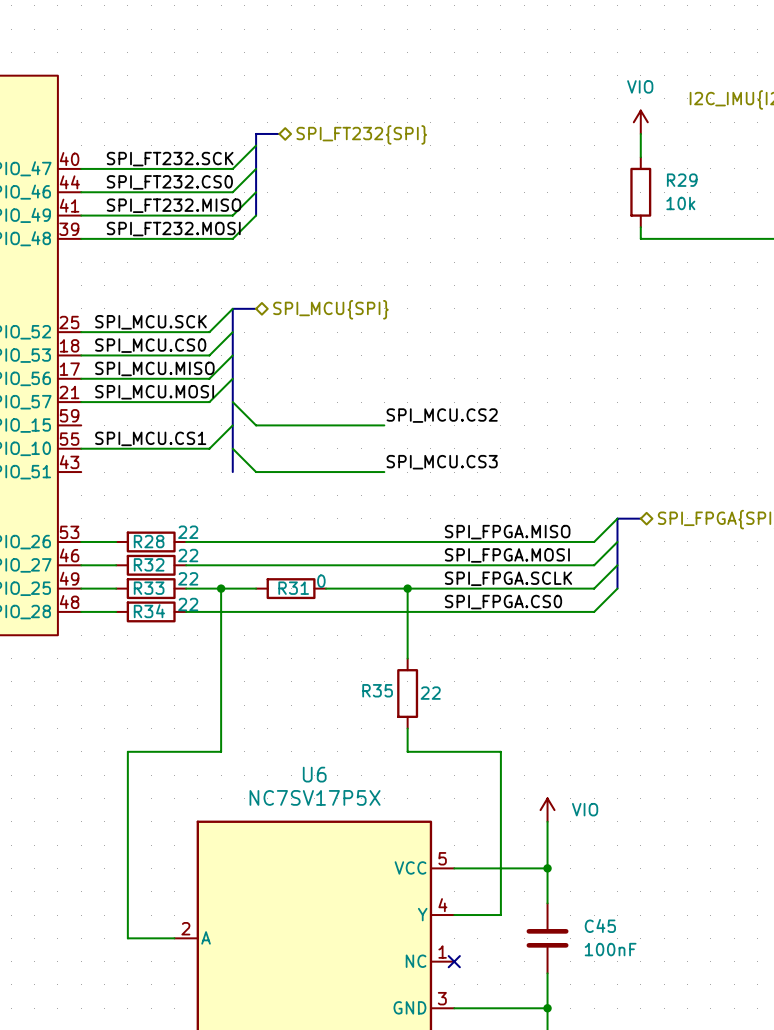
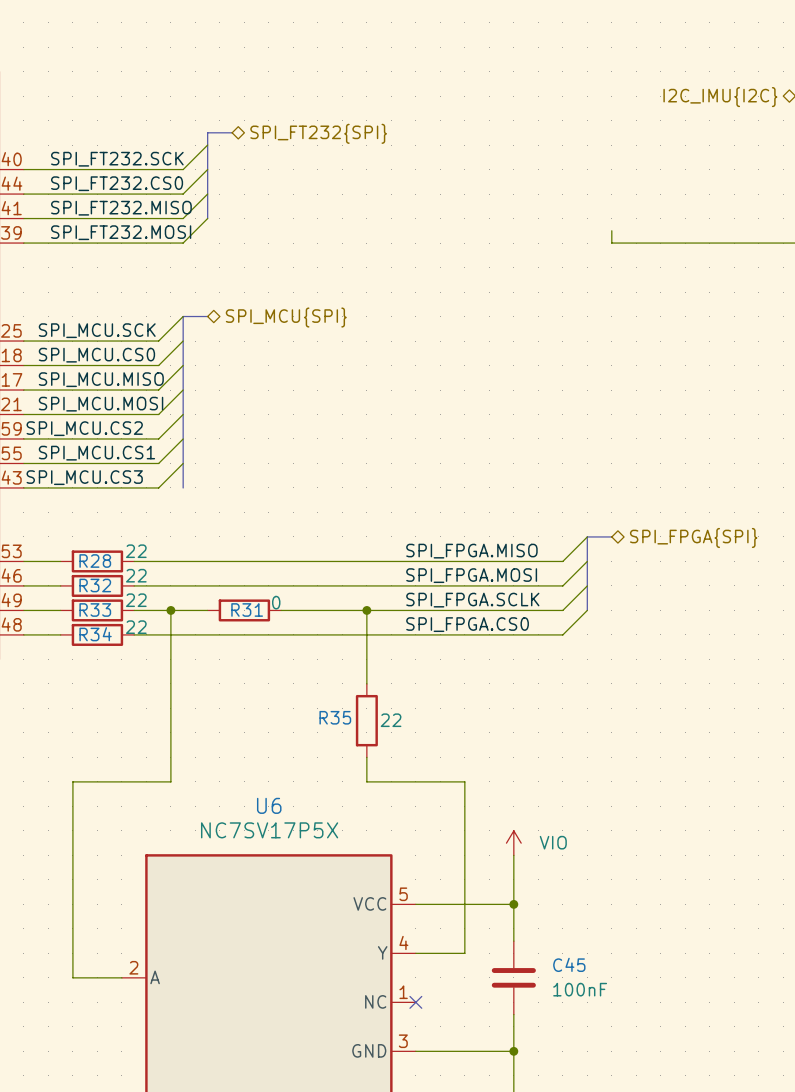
power symbol: VIO (640, 122) -> none
wire: (640, 133) (640, 157) -> none
R29: 10k (640, 192) -> none
wire: (232, 402) (256, 425) (384, 425) -> (183, 414) (158, 438) (23, 438)
label: none -> SPI_MCU.CS2 (84, 428)
label: SPI_MCU.CS2 (442, 415) -> none
wire: (232, 448) (256, 472) (384, 472) -> (183, 463) (158, 487) (23, 487)
label: none -> SPI_MCU.CS3 (84, 477)
label: SPI_MCU.CS3 (442, 462) -> none

